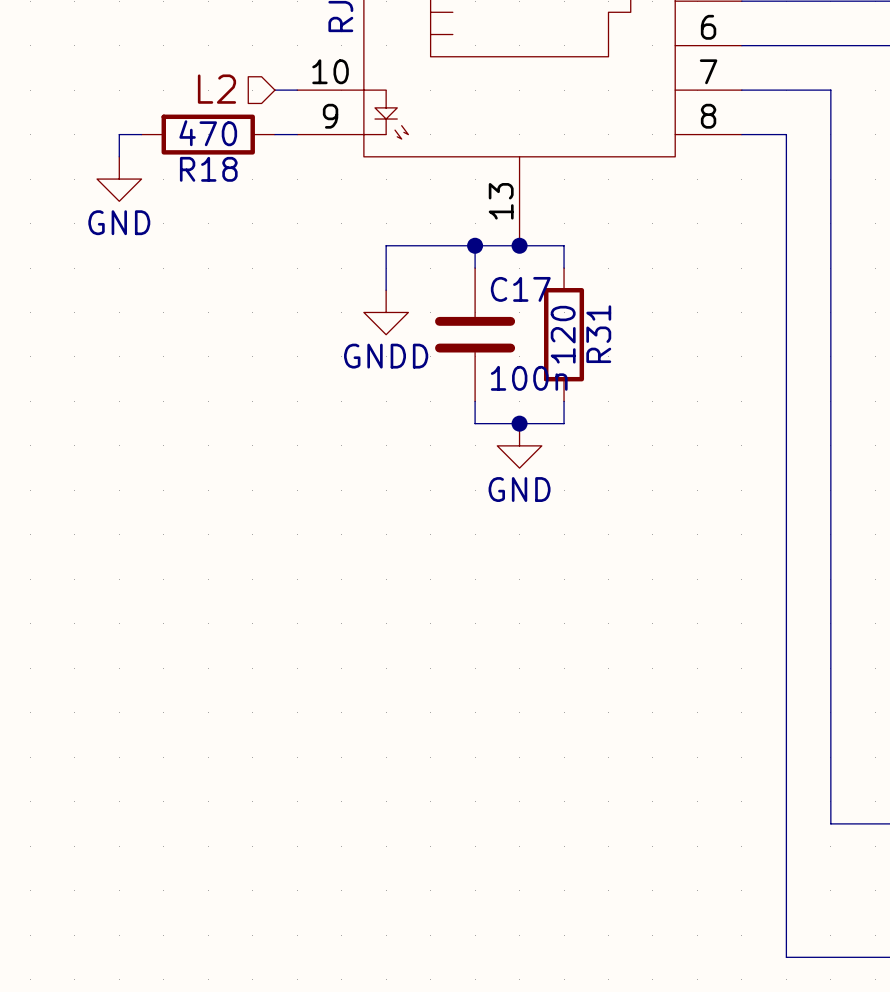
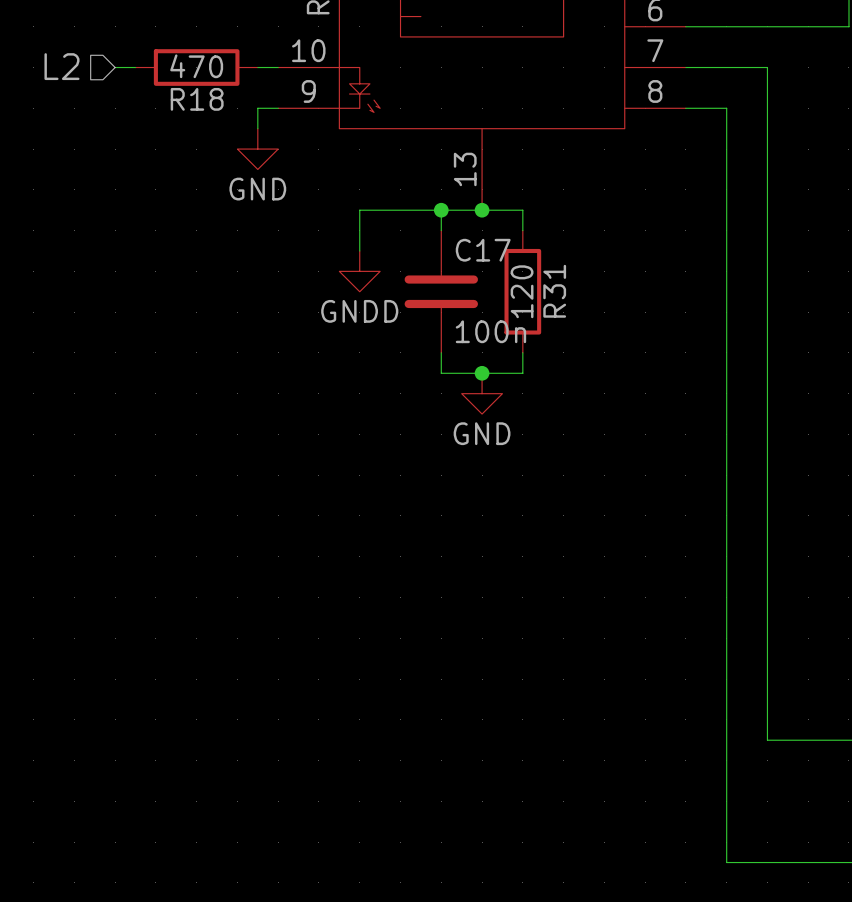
hierarchical label position: L2 (216, 89) -> L2 (61, 66)
wire: none -> (115, 67) (135, 67)
wire: (141, 134) (119, 134) (119, 156) -> none
R18 position: (208, 134) -> (196, 67)
wire: none -> (257, 108) (257, 128)
power symbol position: GND (119, 179) -> GND (257, 149)

